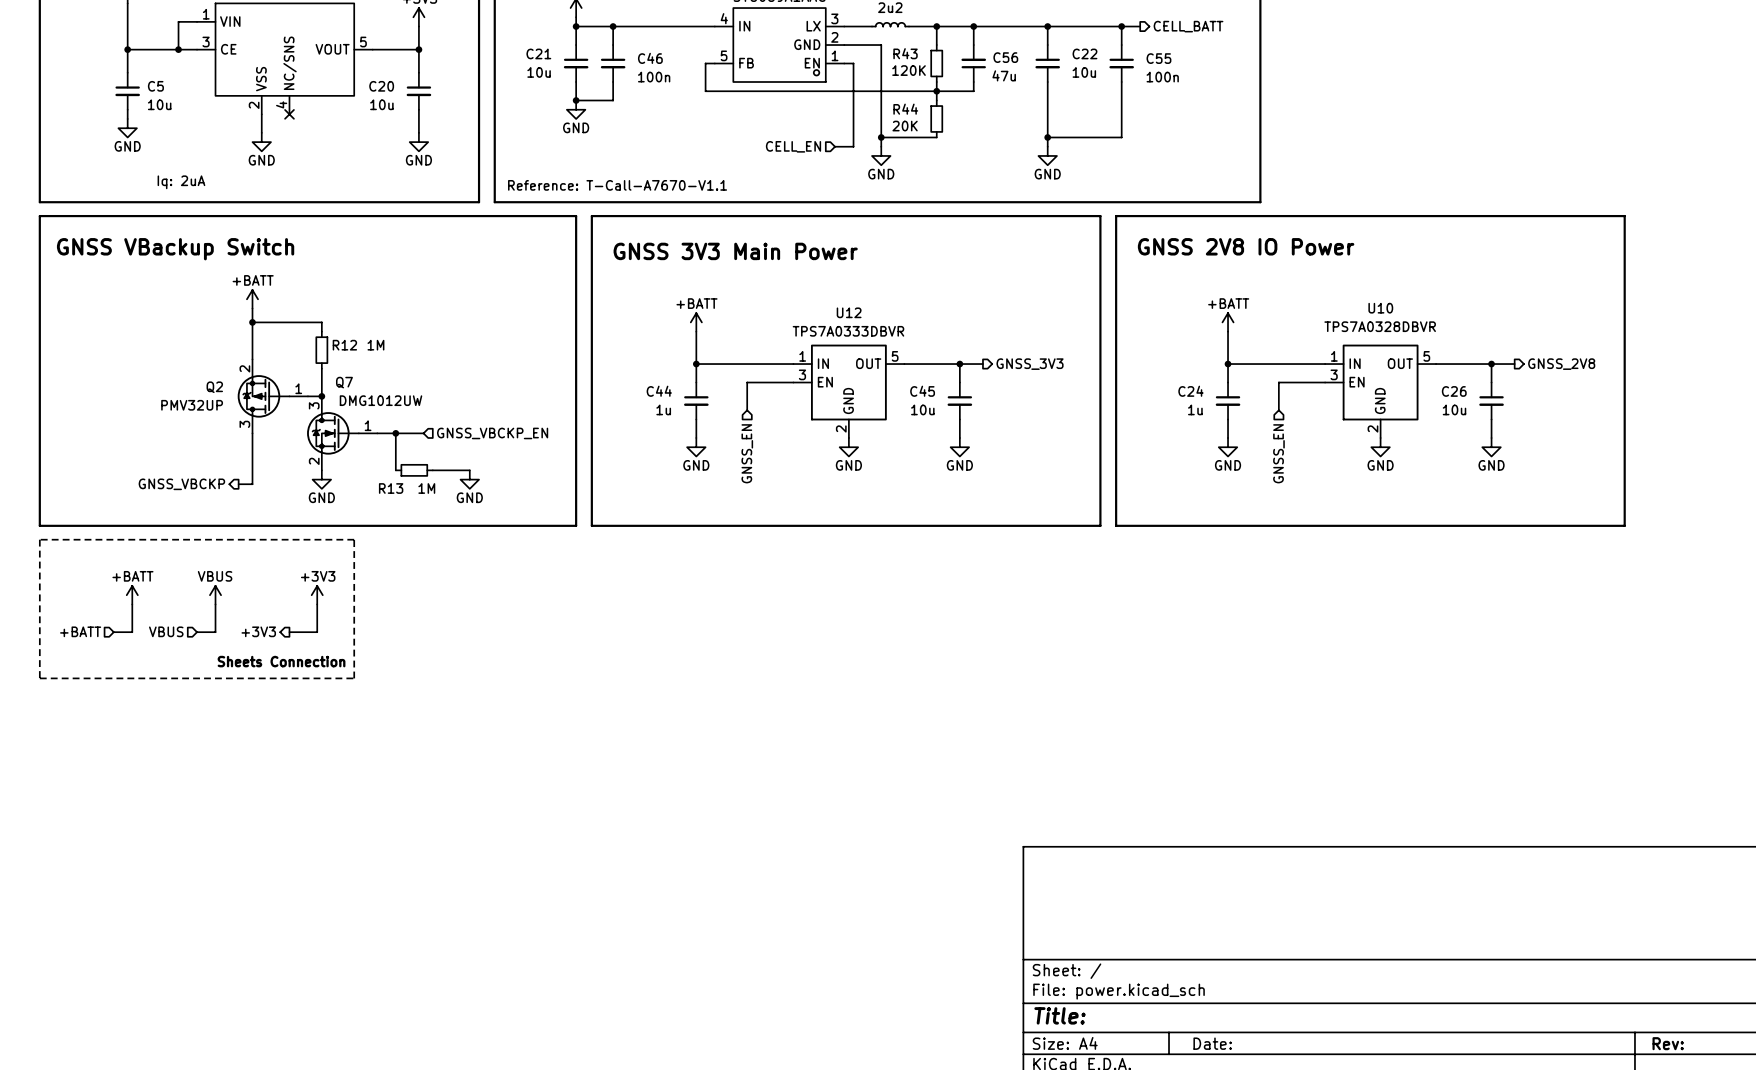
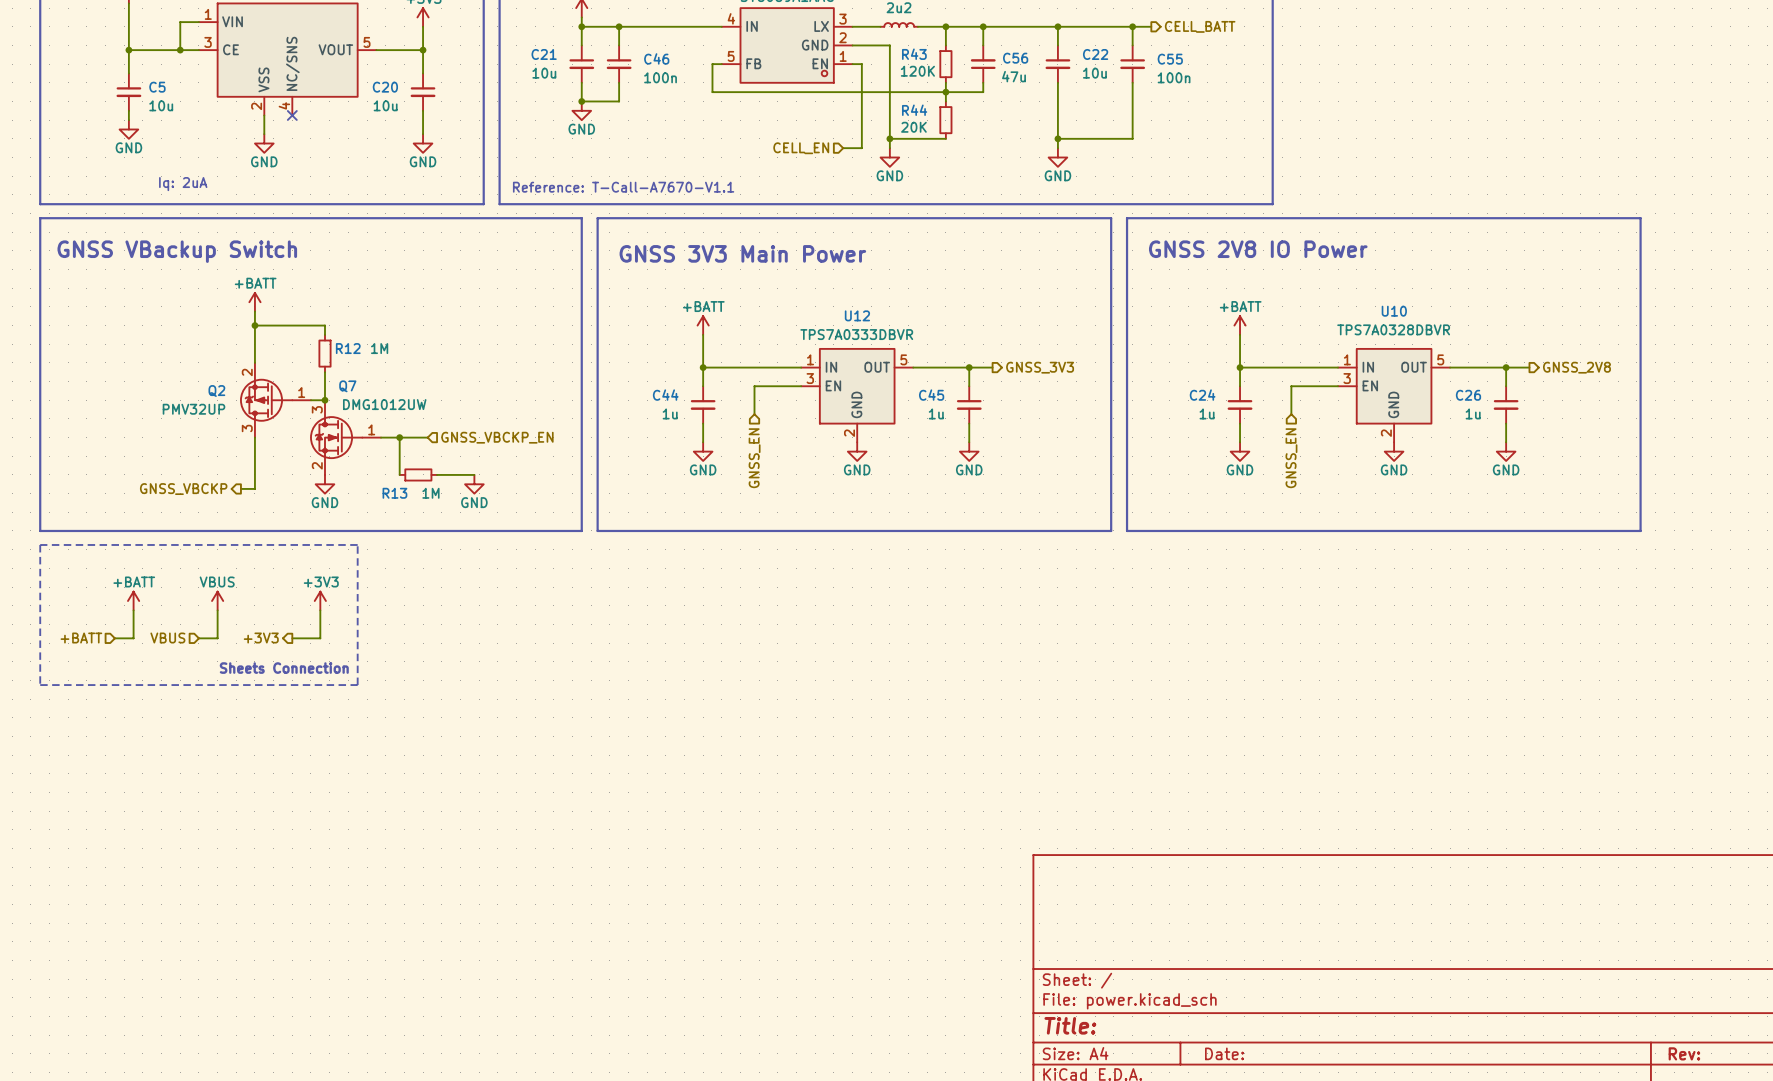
C45 value: 10u (922, 409) -> 1u (936, 413)
C26 value: 10u (1454, 409) -> 1u (1473, 413)

